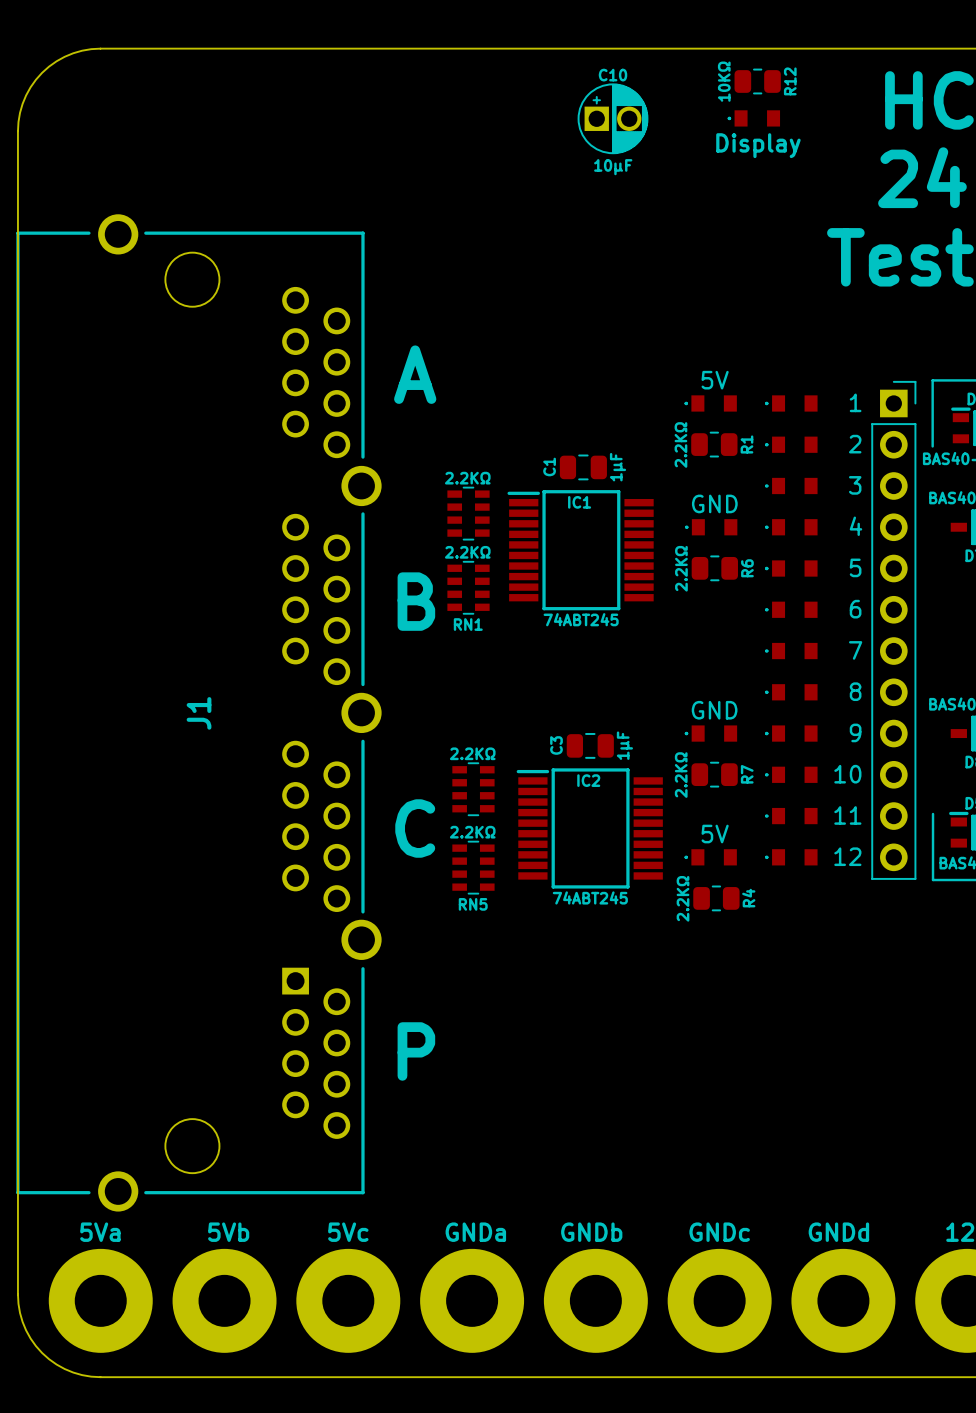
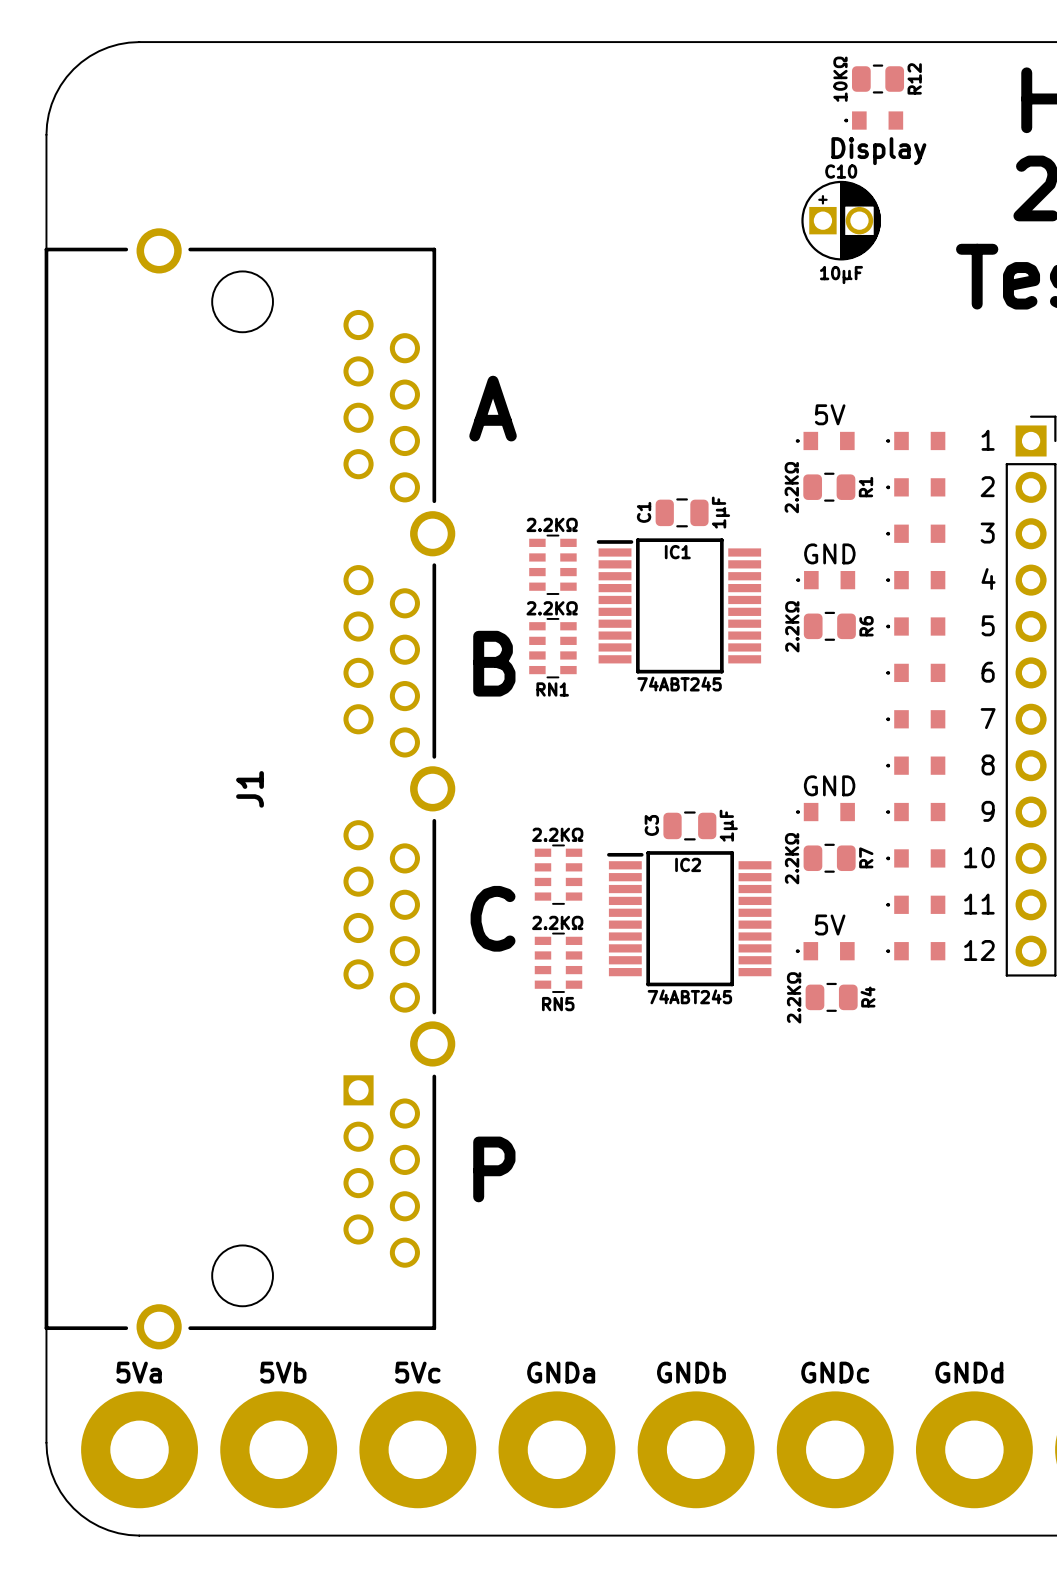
C10 position: (613, 118) -> (841, 220)

